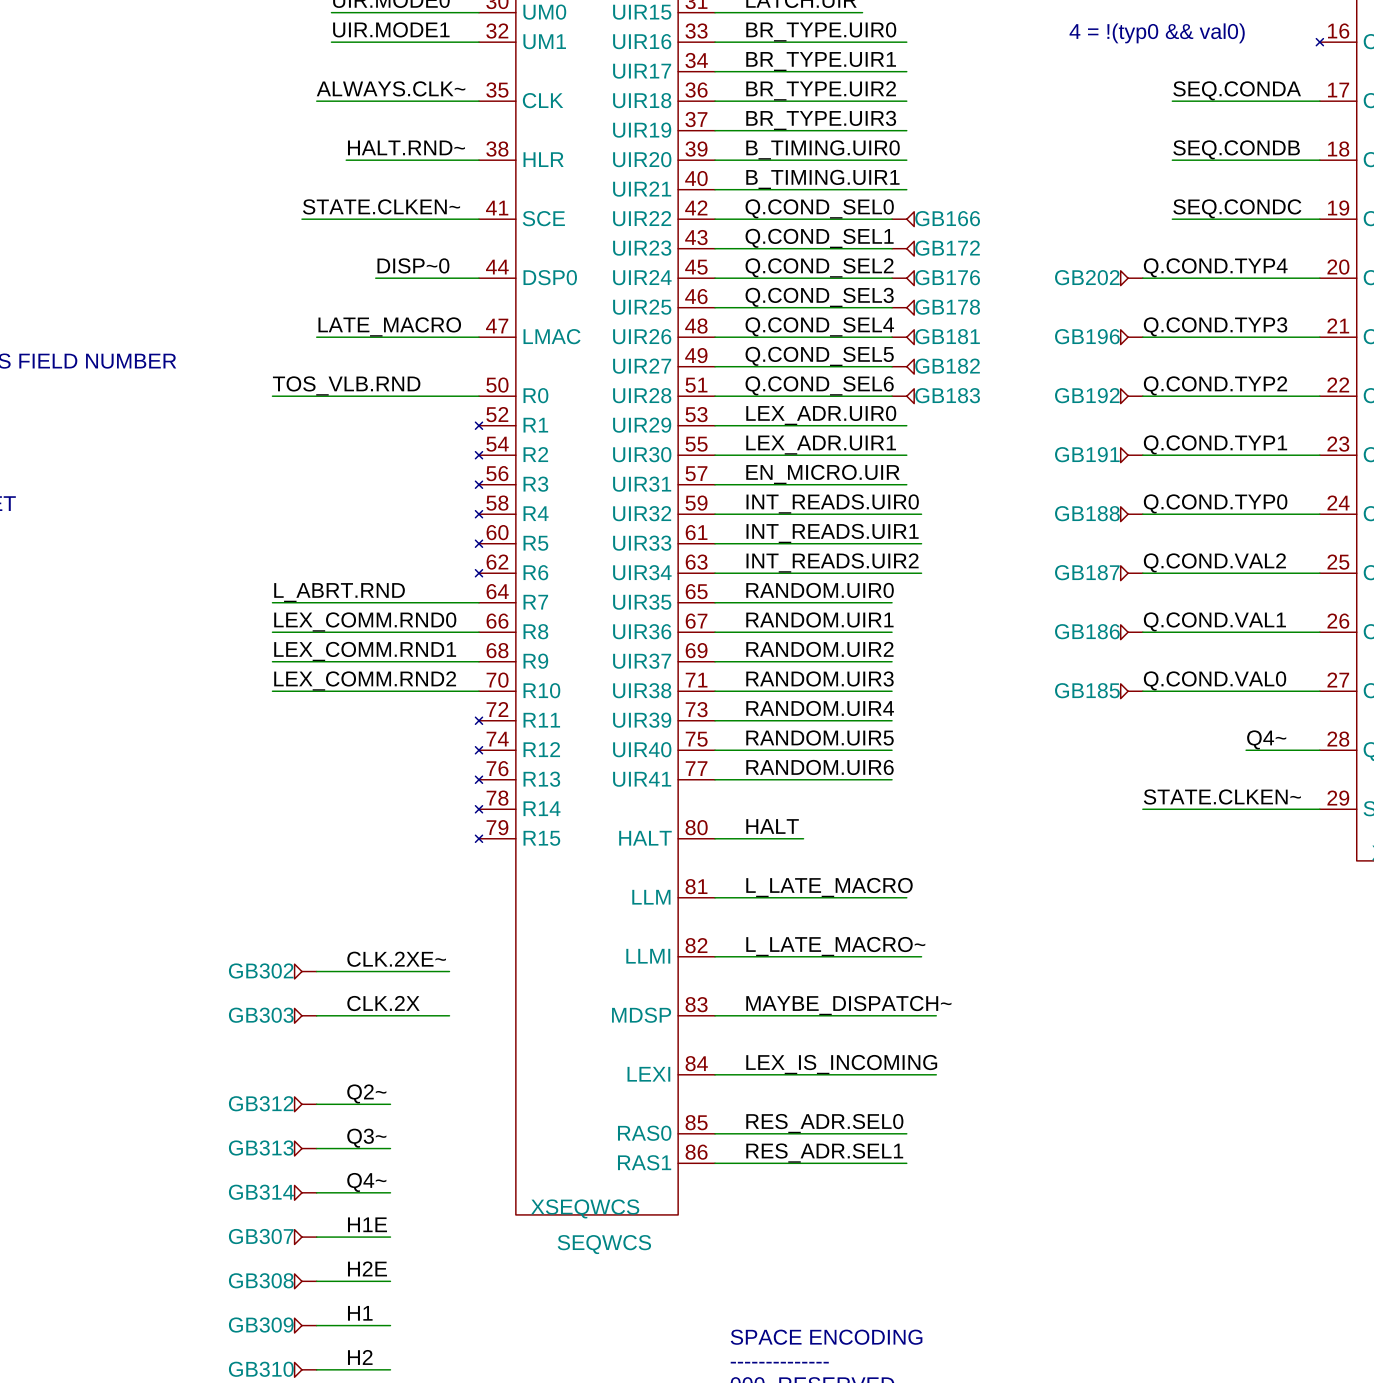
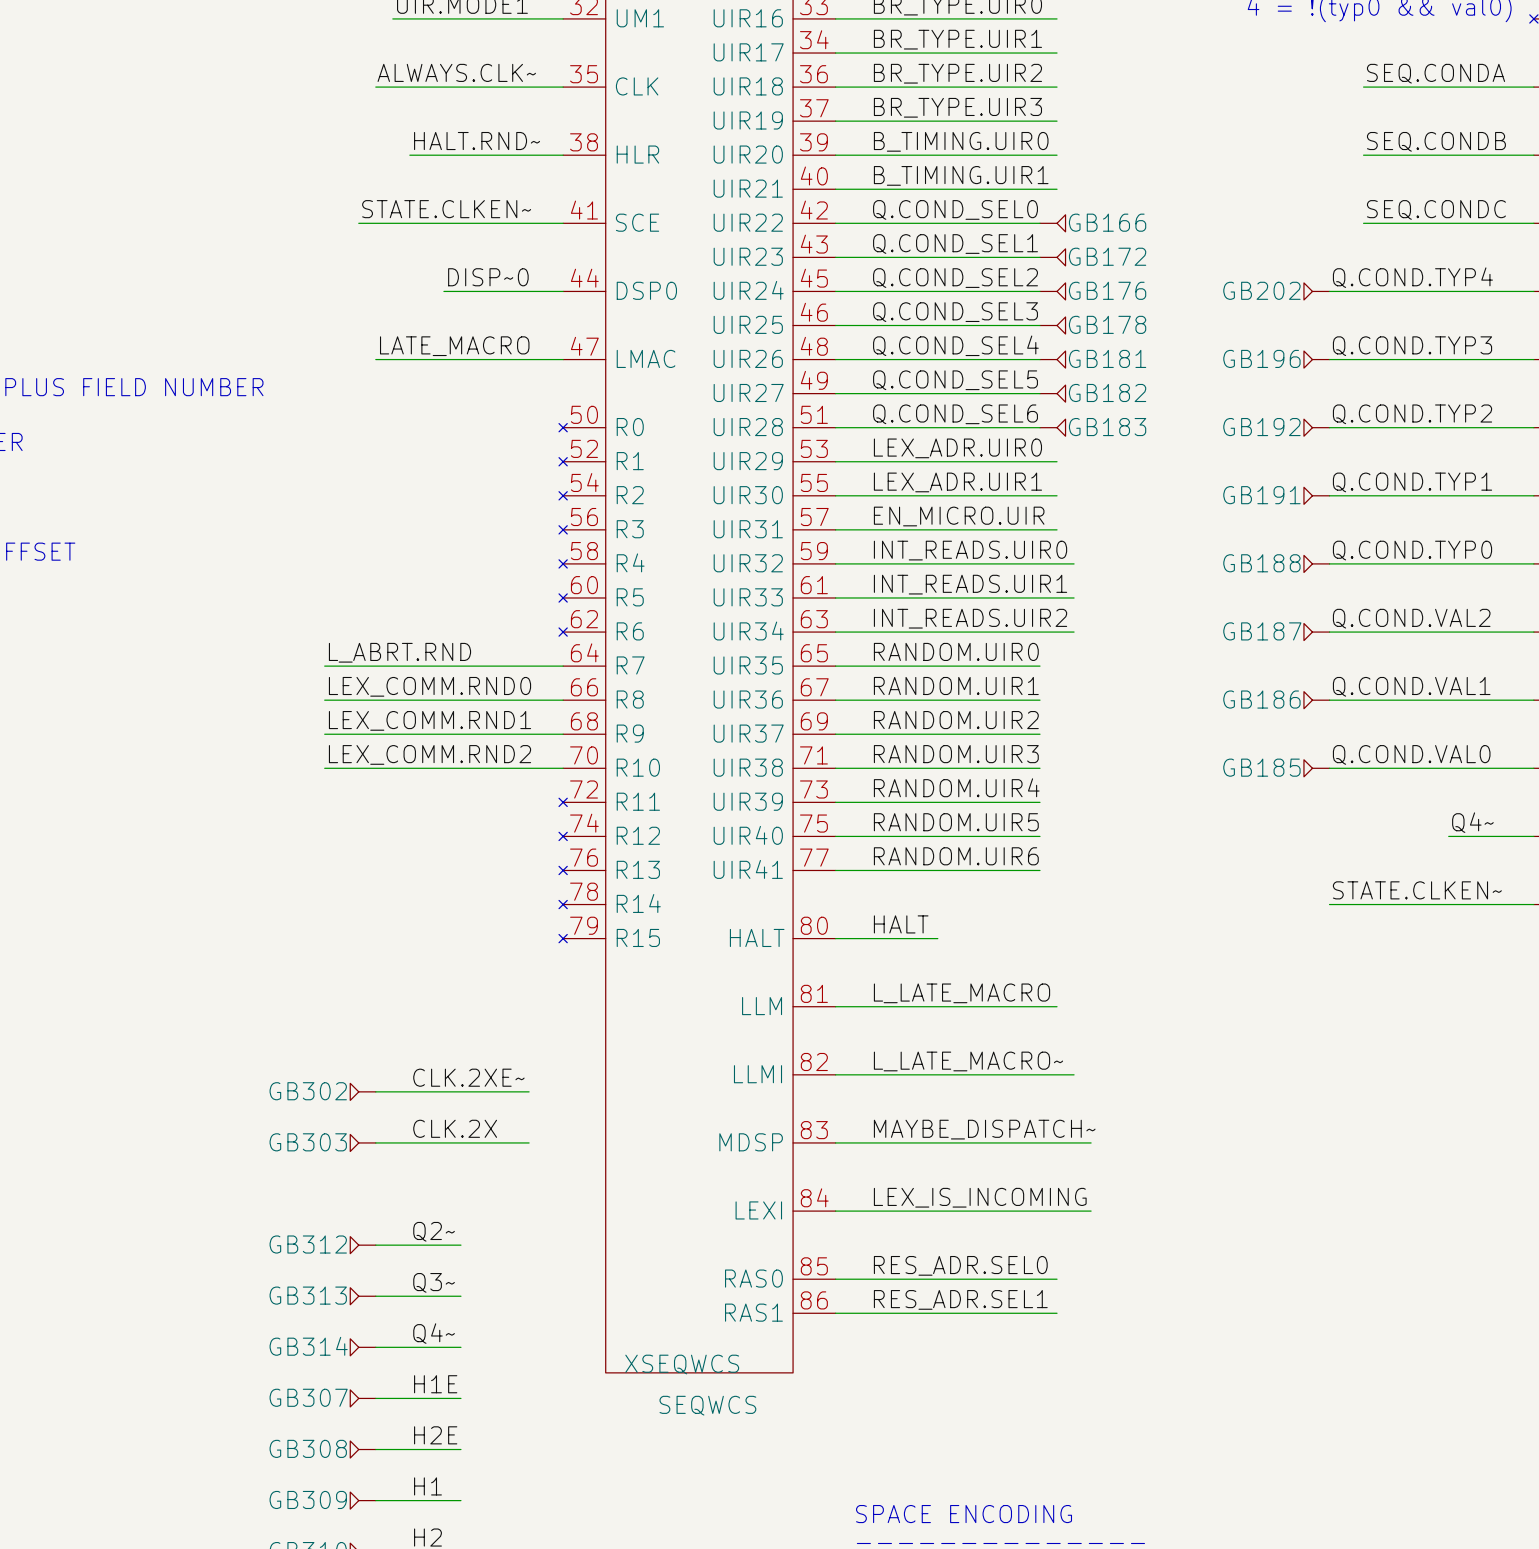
label: TOS_VLB.RND (346, 385) -> none
wire: (272, 396) (478, 396) -> none
no-connect mark: none -> (563, 427)

